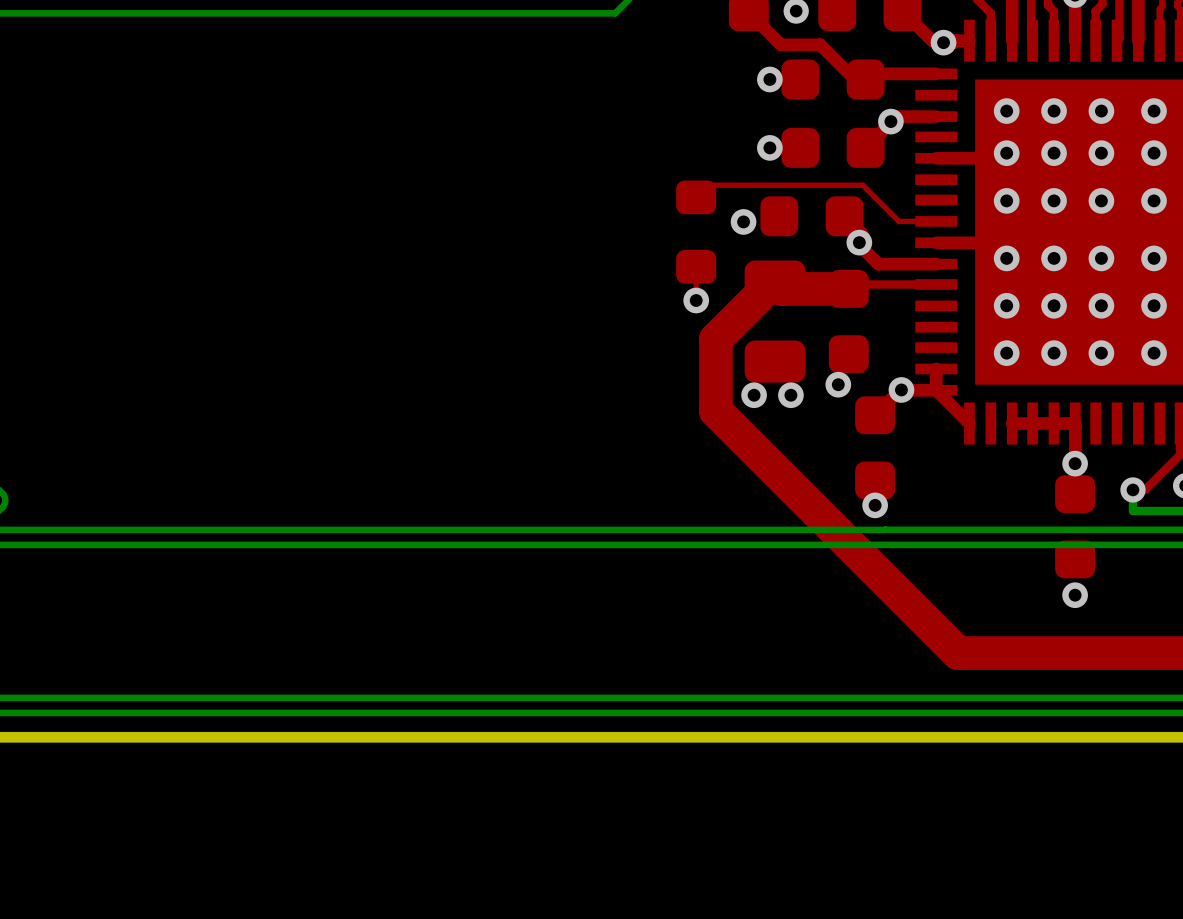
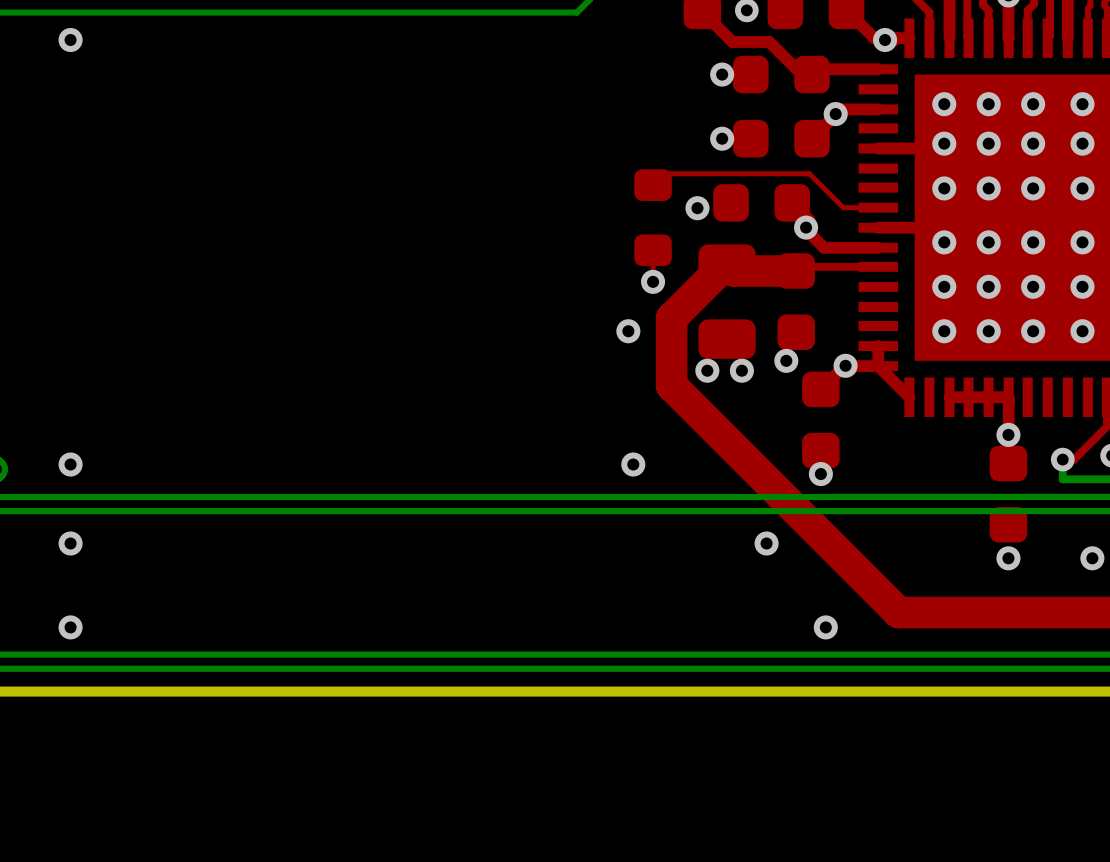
via: none -> (70, 40)
via: none -> (628, 331)
via: none -> (70, 464)
via: none -> (633, 464)
via: none -> (70, 543)
via: none -> (766, 543)
via: none -> (1092, 558)
via: none -> (70, 627)
via: none -> (825, 627)

